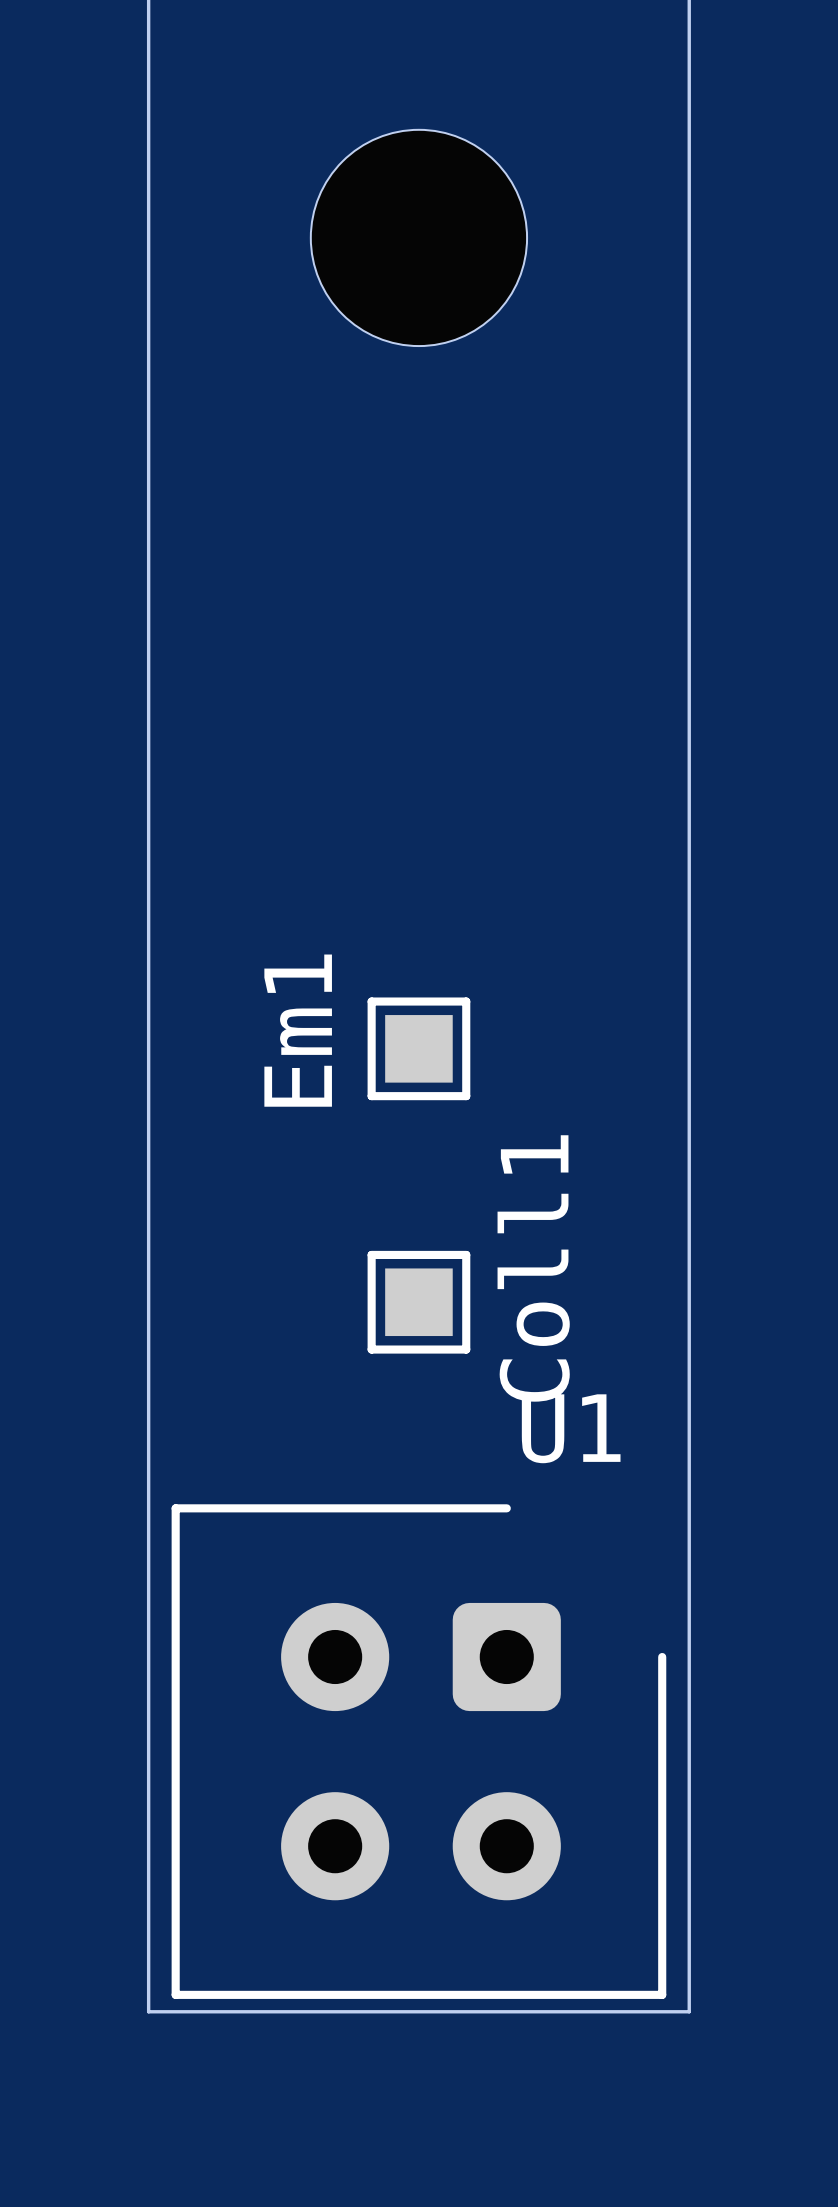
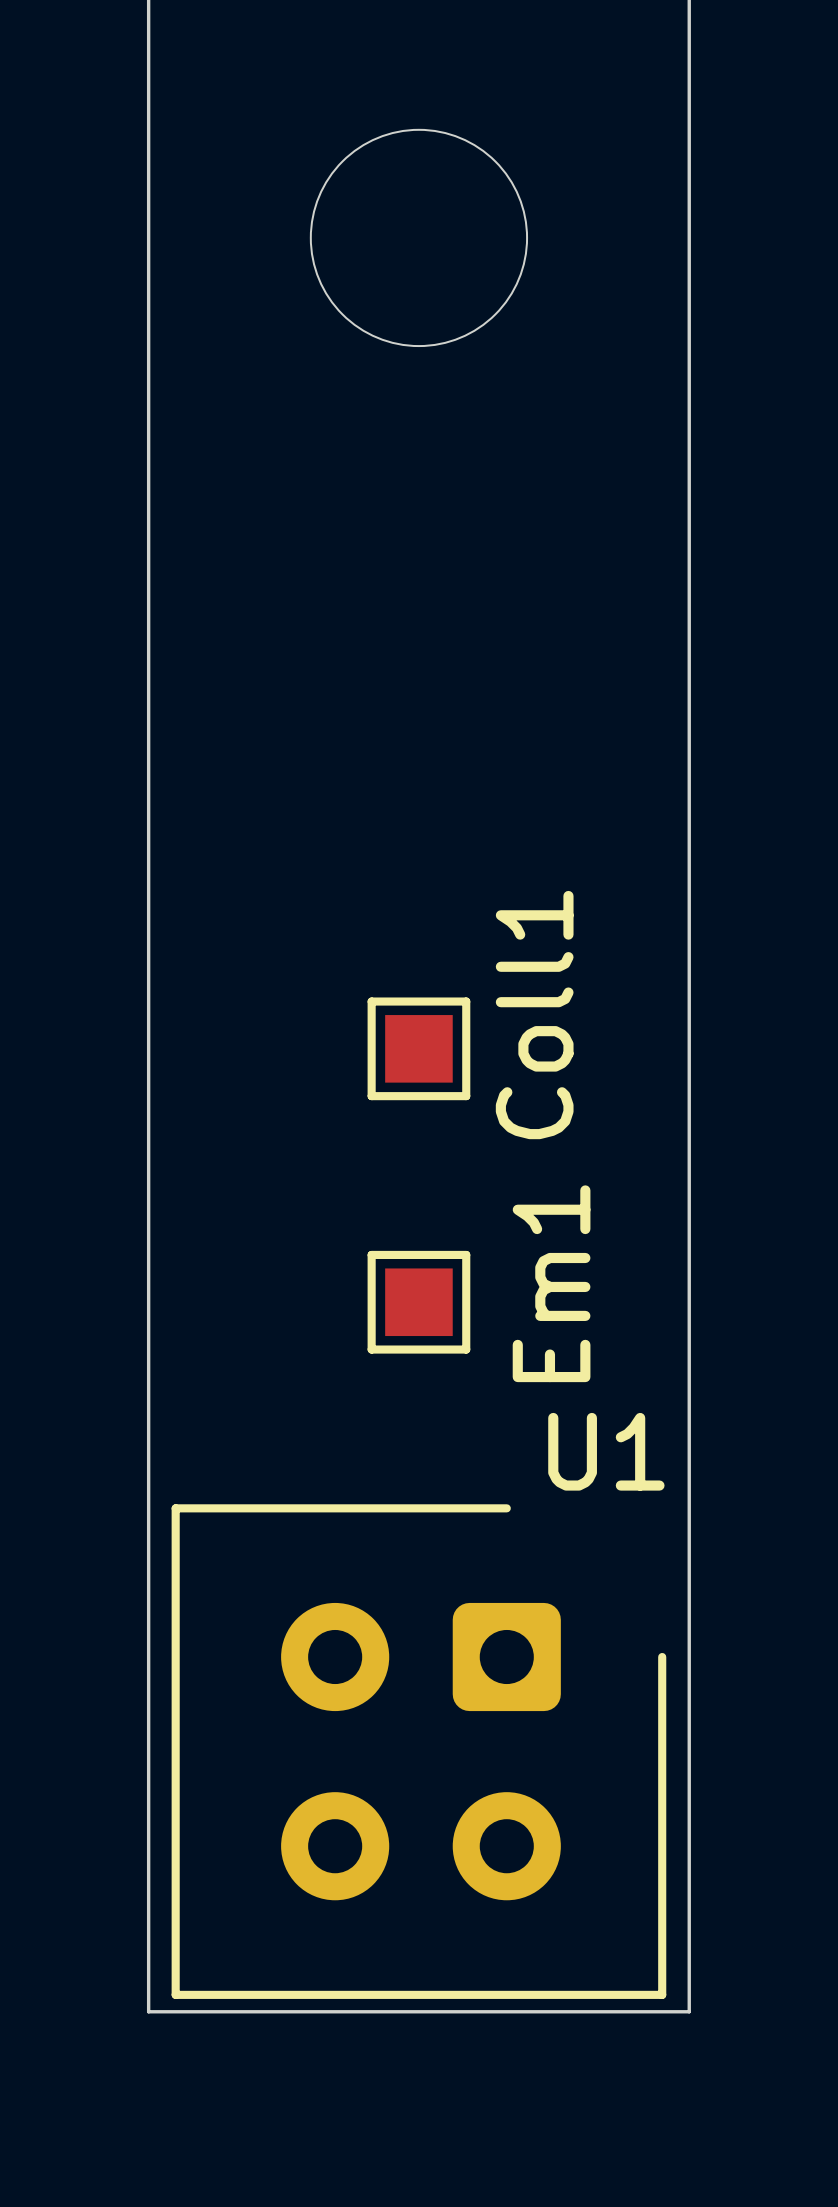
Em1 name: Em1 (298, 1030) -> Coll1 (534, 1015)
Coll1 name: Coll1 (533, 1268) -> Em1 (551, 1283)
U1 name position: U1 (571, 1428) -> U1 (606, 1451)

